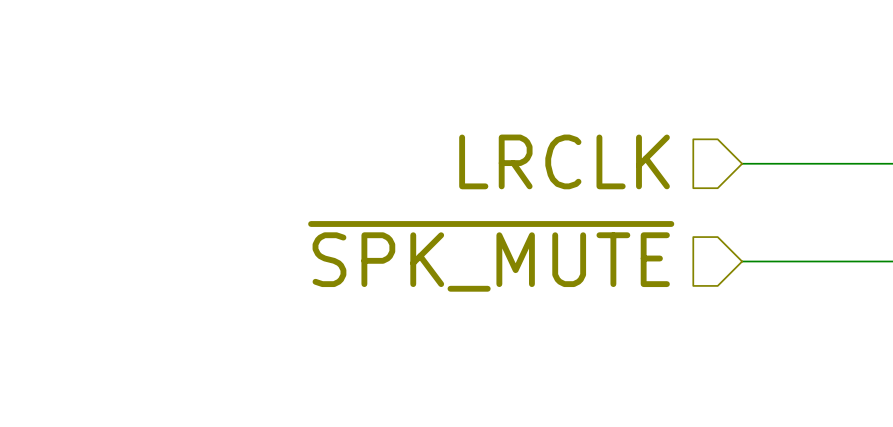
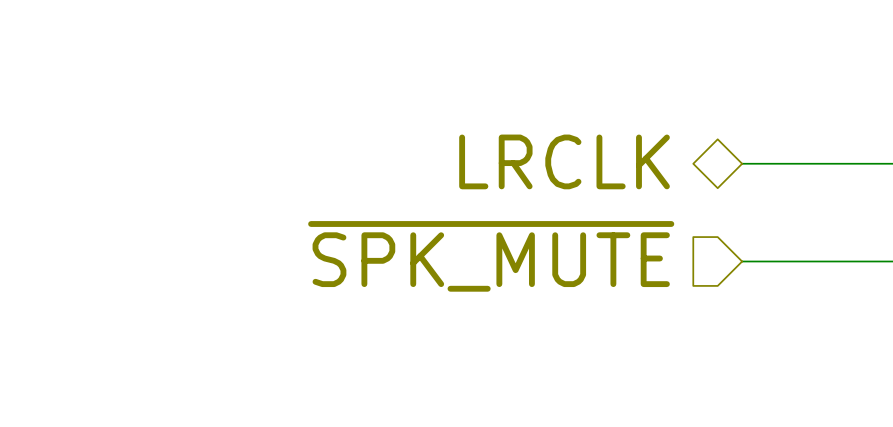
hierarchical label shape: input (564, 161) -> bidirectional (564, 161)

